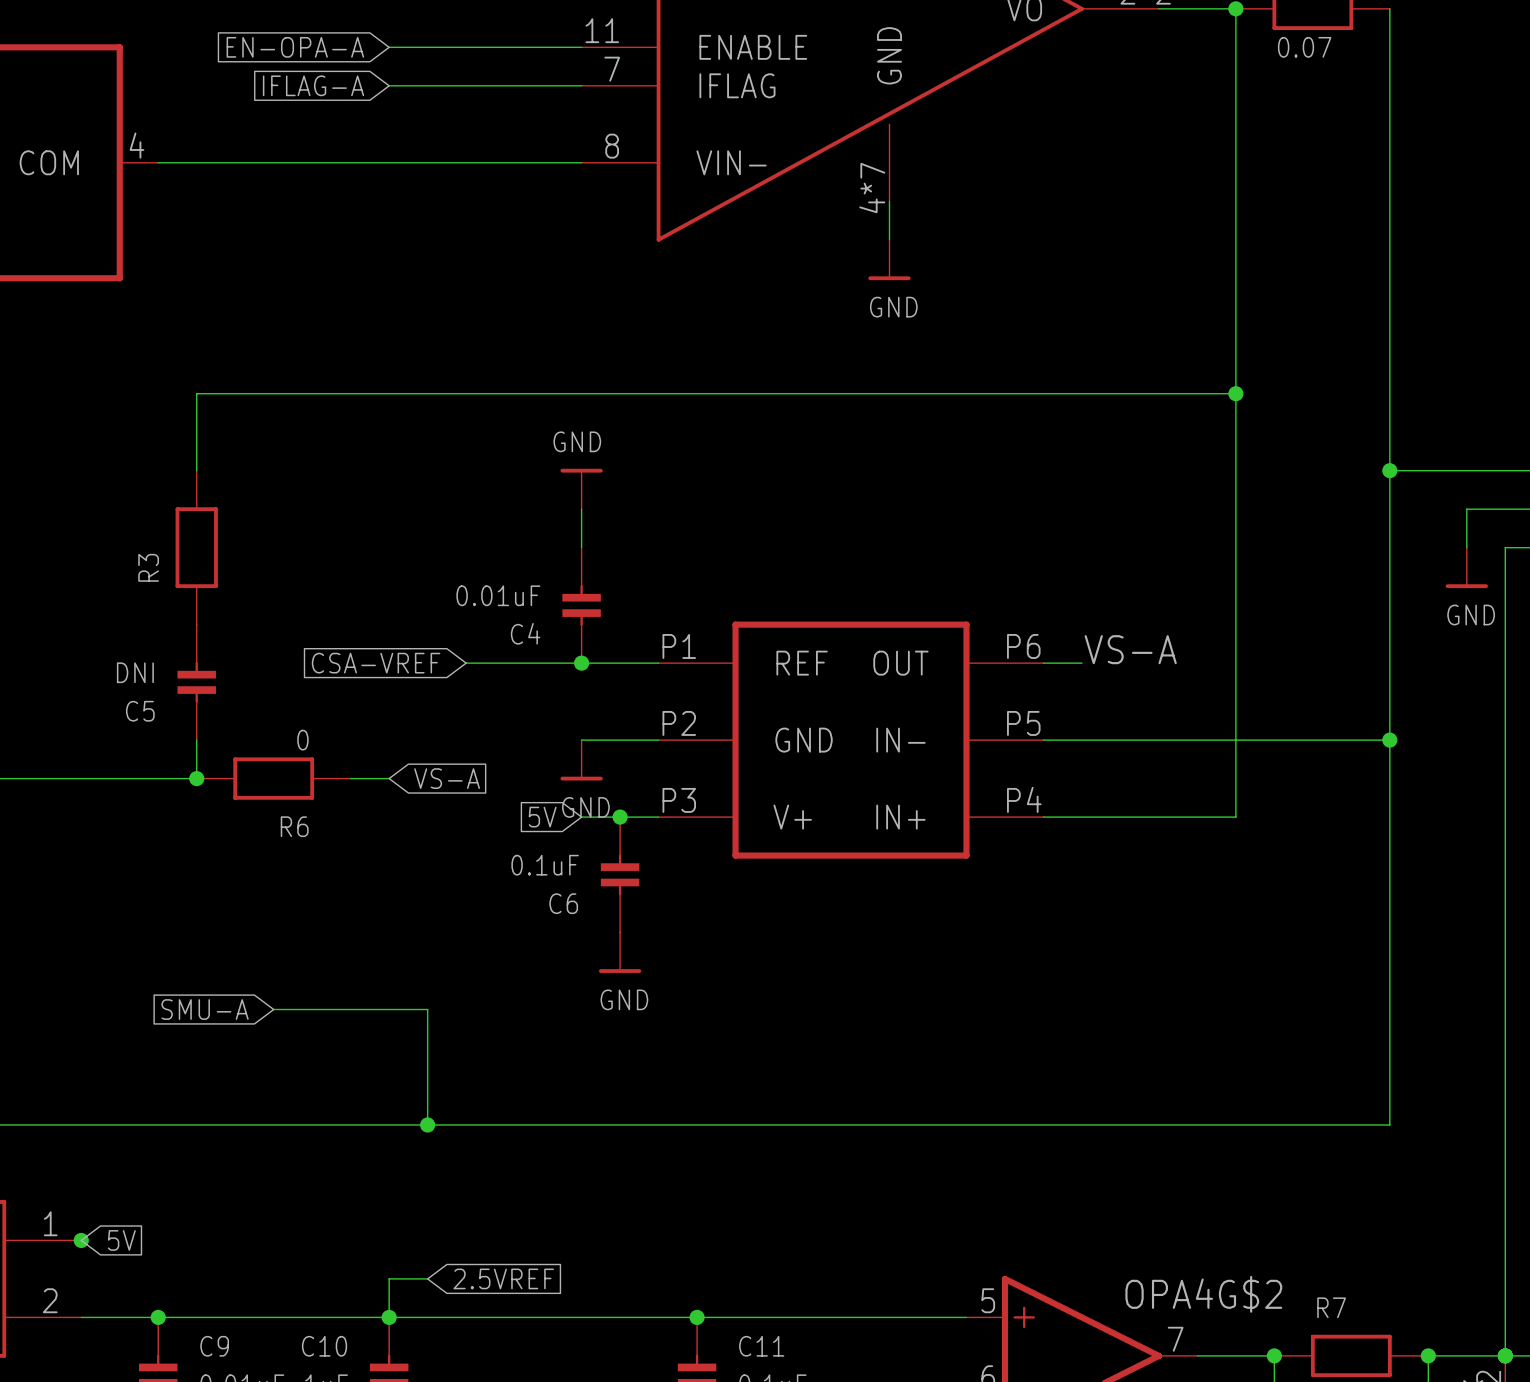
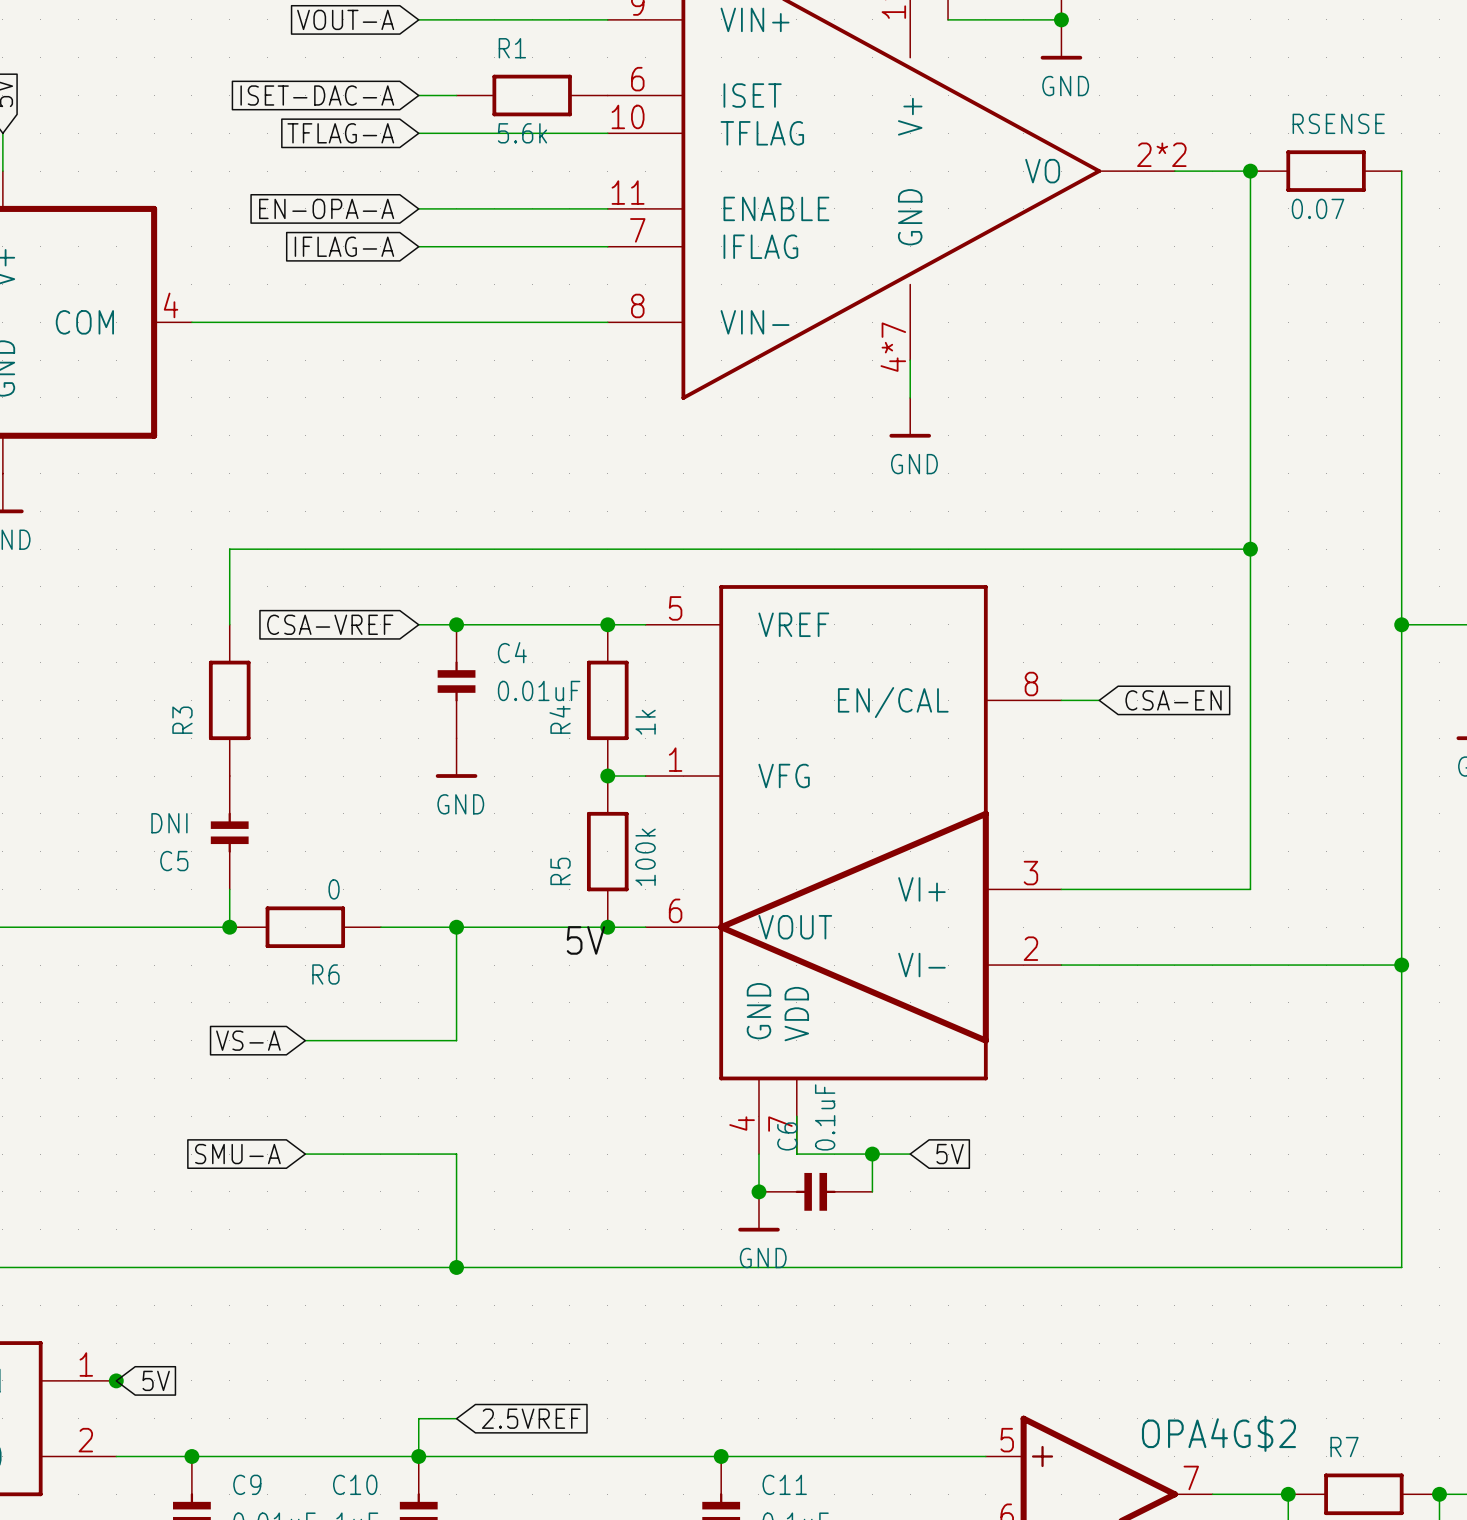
wire: none -> (418, 624) (645, 624)
junction: none -> (456, 624)
junction: none -> (607, 624)
power symbol: GND (581, 488) -> none
wire: (581, 509) (581, 547) -> none
R4: none -> 1k (607, 700)
global label: none -> CSA-EN (1173, 700)
C4 value position: 0.01uF (498, 595) -> 0.01uF (539, 690)
C4 position: (581, 605) -> (456, 681)
power symbol: none -> GND (456, 758)
wire: none -> (607, 776) (645, 776)
C4 name position: C4 (525, 633) -> C4 (512, 652)
label: VS-A (1130, 649) -> none
global label position: CSA-VREF (376, 663) -> CSA-VREF (330, 624)
wire: (466, 663) (658, 663) -> none
junction position: (581, 663) -> (607, 776)
wire: (1043, 663) (1081, 663) -> (1061, 700) (1099, 700)
R5: none -> 100k (607, 851)
part: none -> (853, 869)
wire: (581, 740) (658, 740) -> none
part: (851, 740) -> none
wire: (1389, 740) (1235, 740) (1235, 817) -> (1401, 965) (1250, 965)
junction position: (1389, 740) -> (1401, 965)
power symbol: GND (581, 760) -> none
wire: none -> (418, 927) (645, 927)
wire: none -> (456, 927) (456, 1040) (305, 1040)
junction: none -> (456, 927)
global label rotation: 0° (447, 778) -> 180° (248, 1040)
global label position: VS-A (447, 778) -> VS-A (248, 1040)
label: none -> 5V (585, 940)
global label rotation: 0° (542, 817) -> 180° (950, 1154)
global label position: 5V (542, 817) -> 5V (950, 1154)
wire: (581, 817) (658, 817) -> none
junction position: (620, 817) -> (607, 927)
C6 rotation: 0° (620, 874) -> 90° clockwise (815, 1191)
C6 position: (620, 874) -> (815, 1191)
power symbol position: GND (620, 952) -> GND (758, 1211)
wire: none -> (796, 1116) (796, 1154) (910, 1154)
wire: none -> (758, 1154) (758, 1191)
wire: none -> (872, 1154) (872, 1191)
junction: none -> (872, 1154)
junction: none -> (758, 1191)

